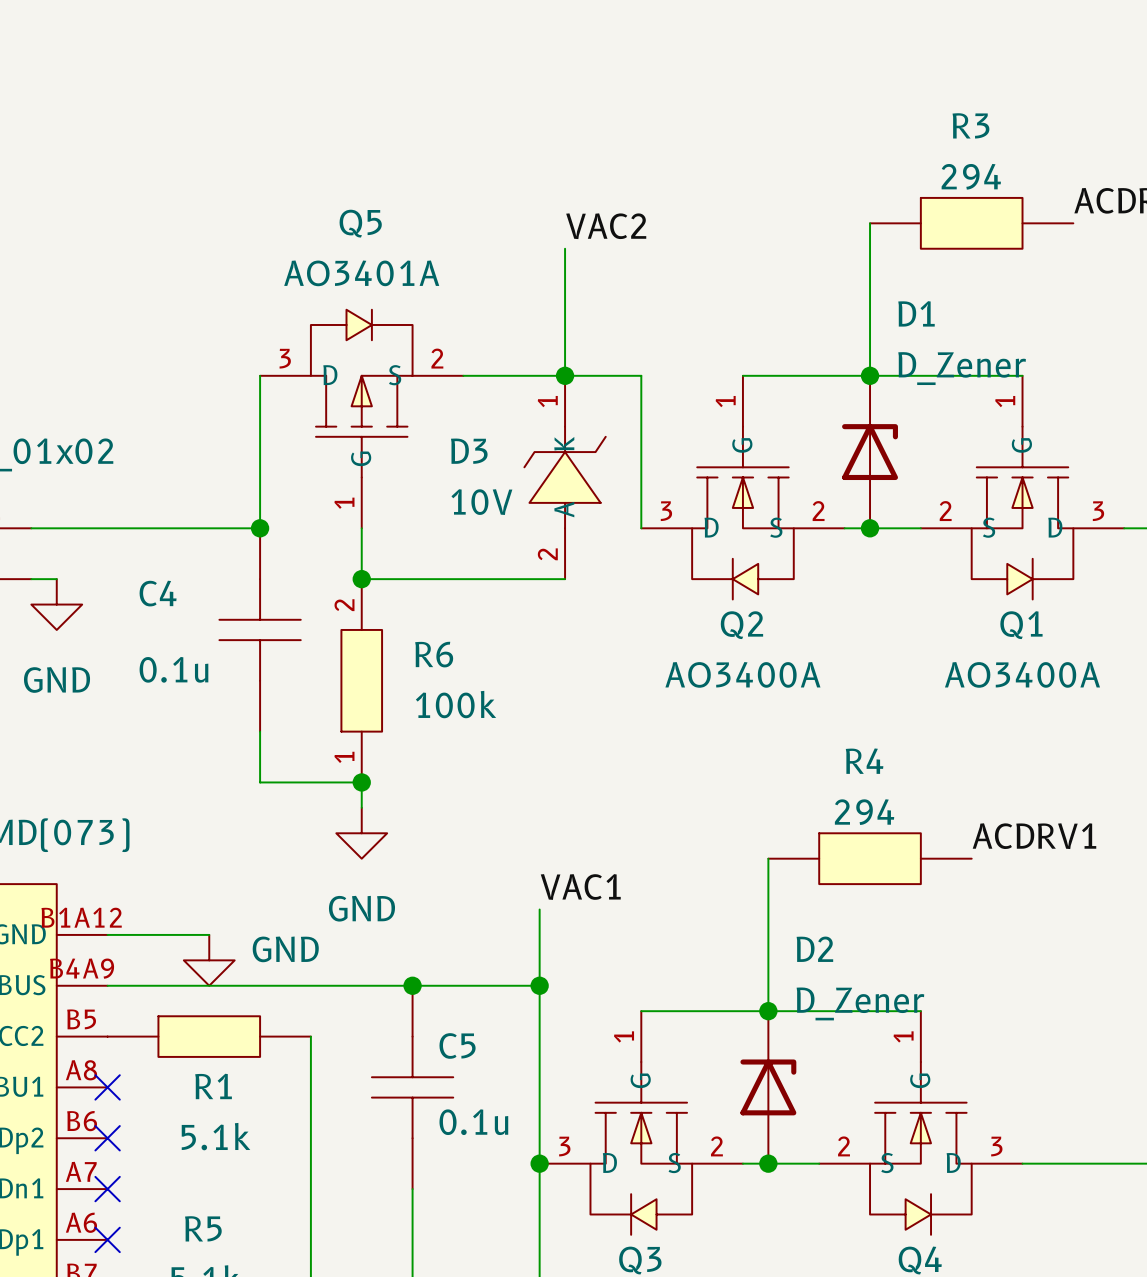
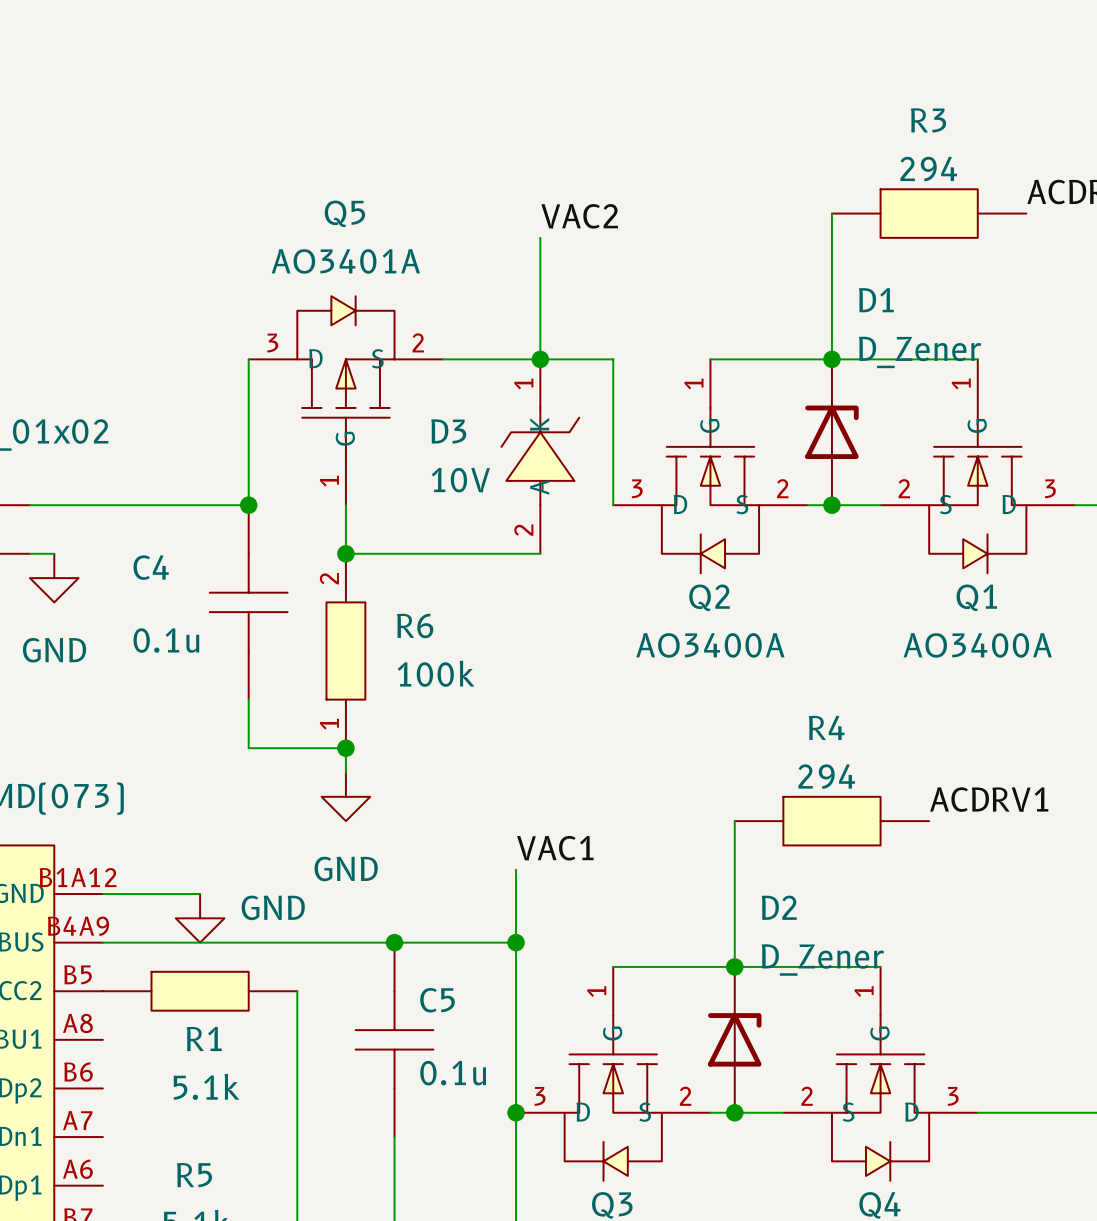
no-connect mark: (107, 1087) -> none
no-connect mark: (107, 1138) -> none
no-connect mark: (107, 1189) -> none
no-connect mark: (107, 1239) -> none

